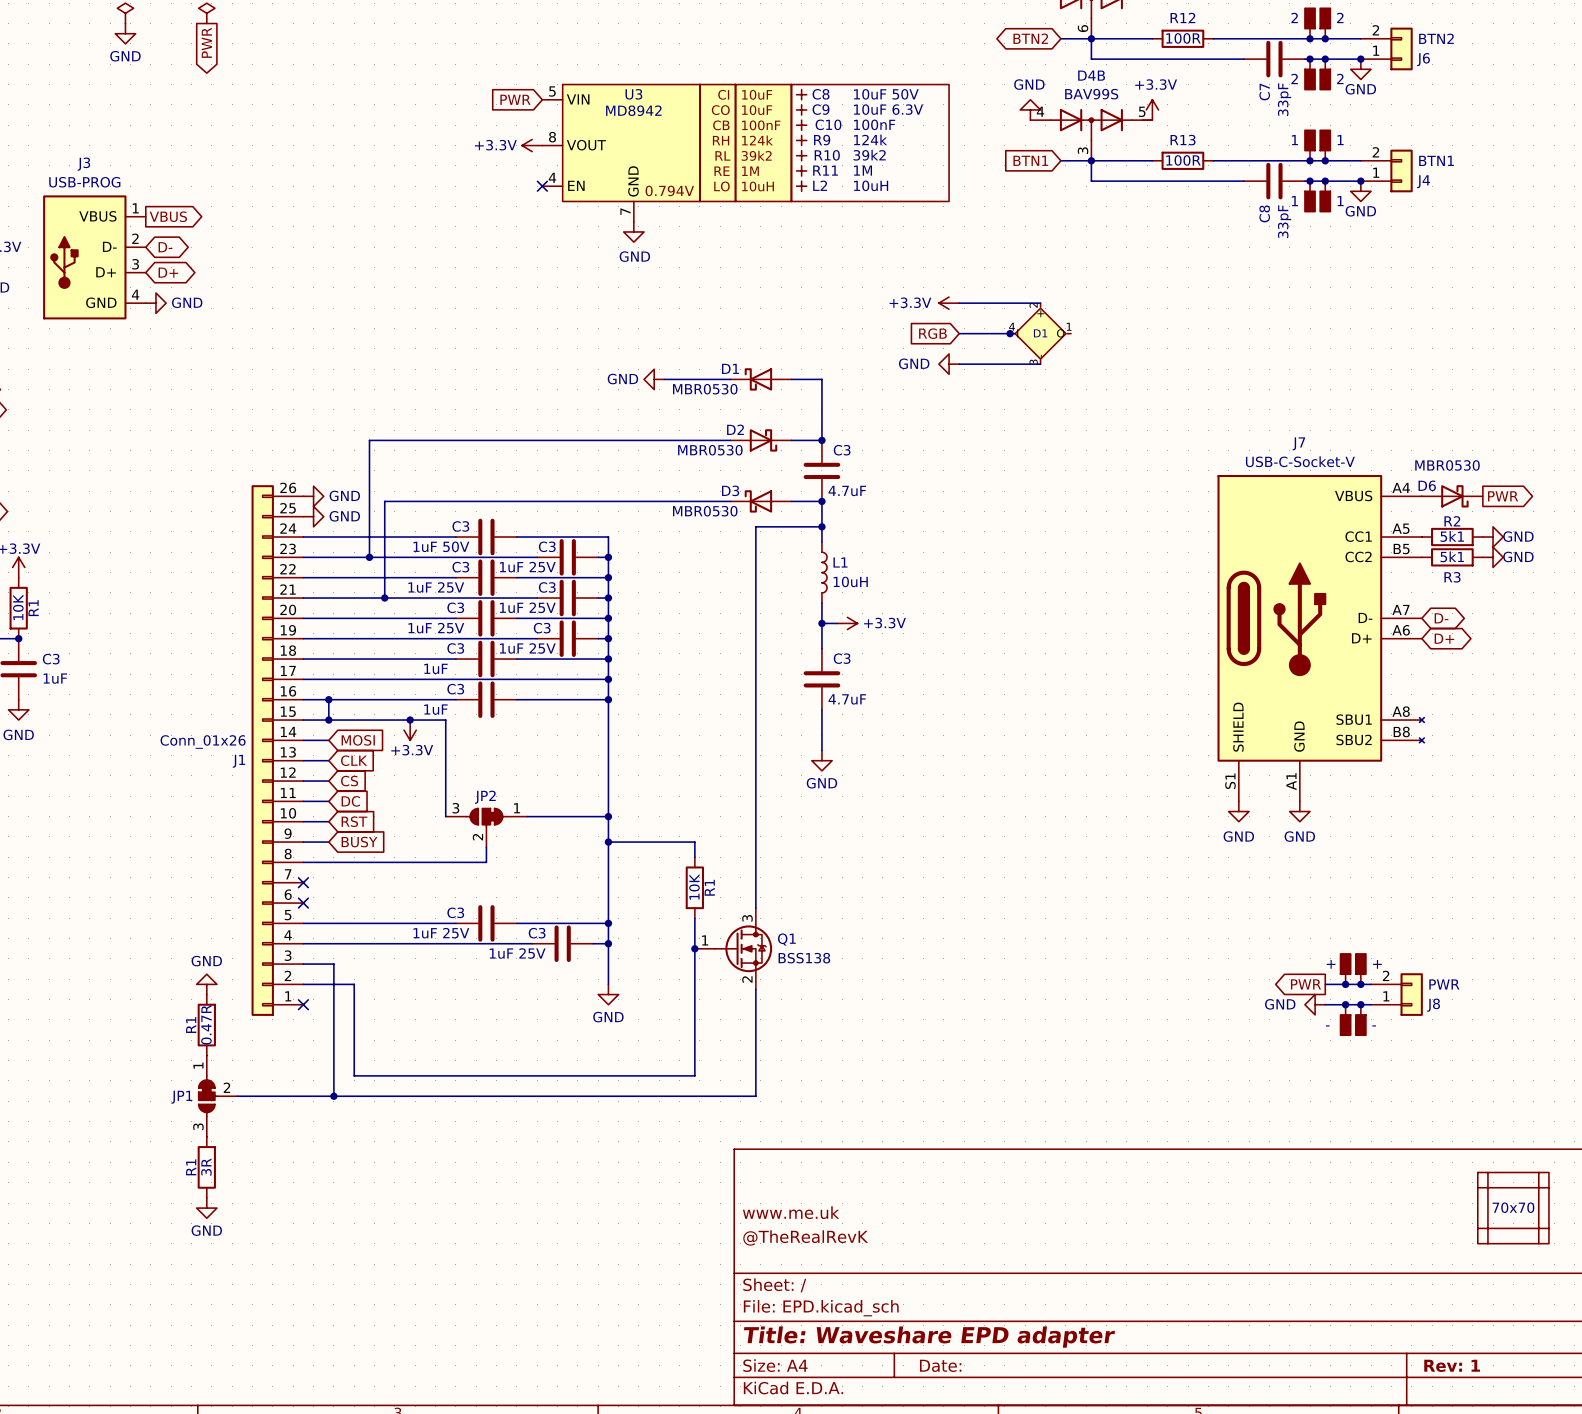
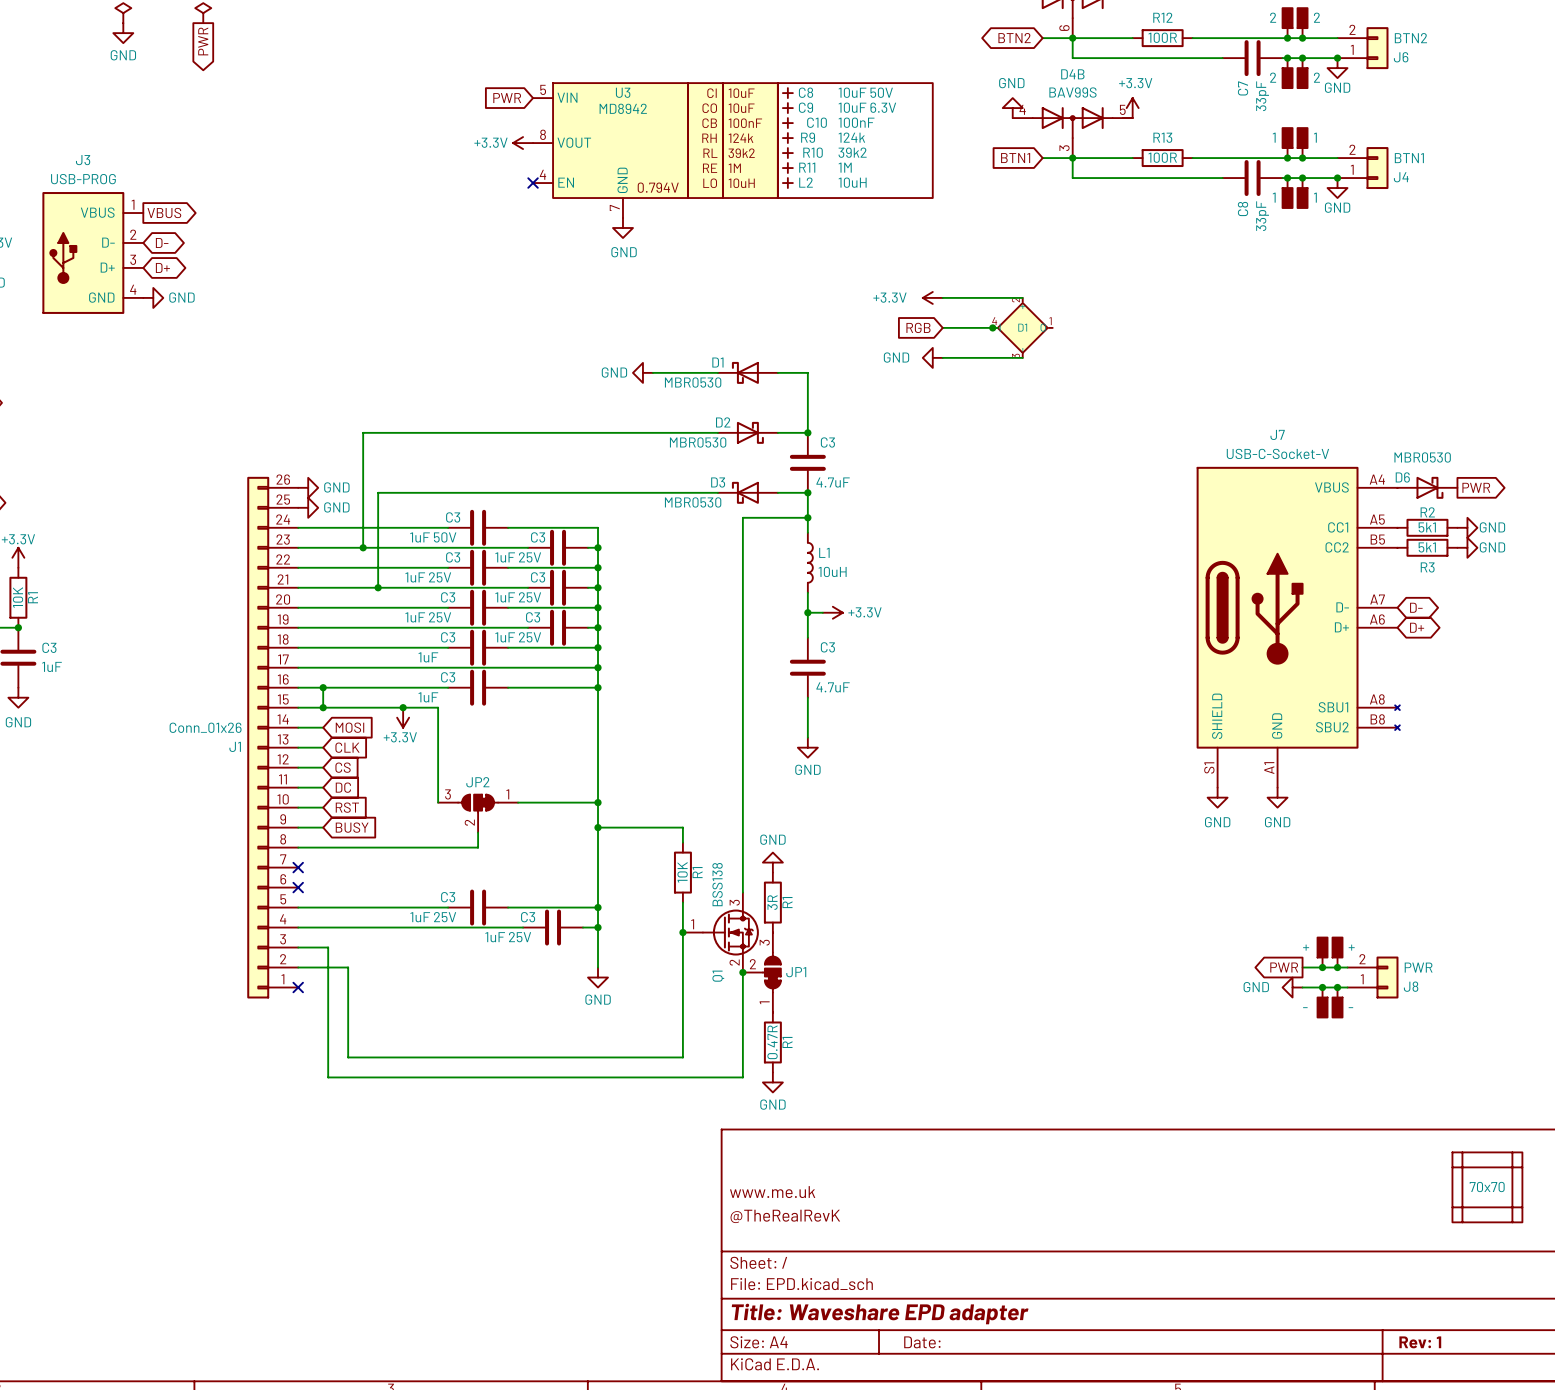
power symbol: none -> GND (772, 862)
R1: none -> 3R (772, 902)
Q1 name rotation: 0° (786, 939) -> 90° counterclockwise (718, 976)
Q1 name position: Q1 (786, 939) -> Q1 (718, 976)
Q1 value rotation: 0° (804, 958) -> 90° counterclockwise (717, 884)
Q1 value position: BSS138 (804, 958) -> BSS138 (717, 884)
power symbol: GND (206, 984) -> none
junction: none -> (742, 972)
R1: 0.47R (206, 1025) -> none
R1: none -> 0.47R (772, 1042)
JP1 rotation: 0° (207, 1096) -> 180° (771, 972)
JP1 position: (217, 1096) -> (761, 972)
wire: (237, 1096) (333, 1096) -> none
junction: (333, 1096) -> none
power symbol: none -> GND (772, 1082)
R1: 3R (206, 1167) -> none
power symbol: GND (206, 1208) -> none

